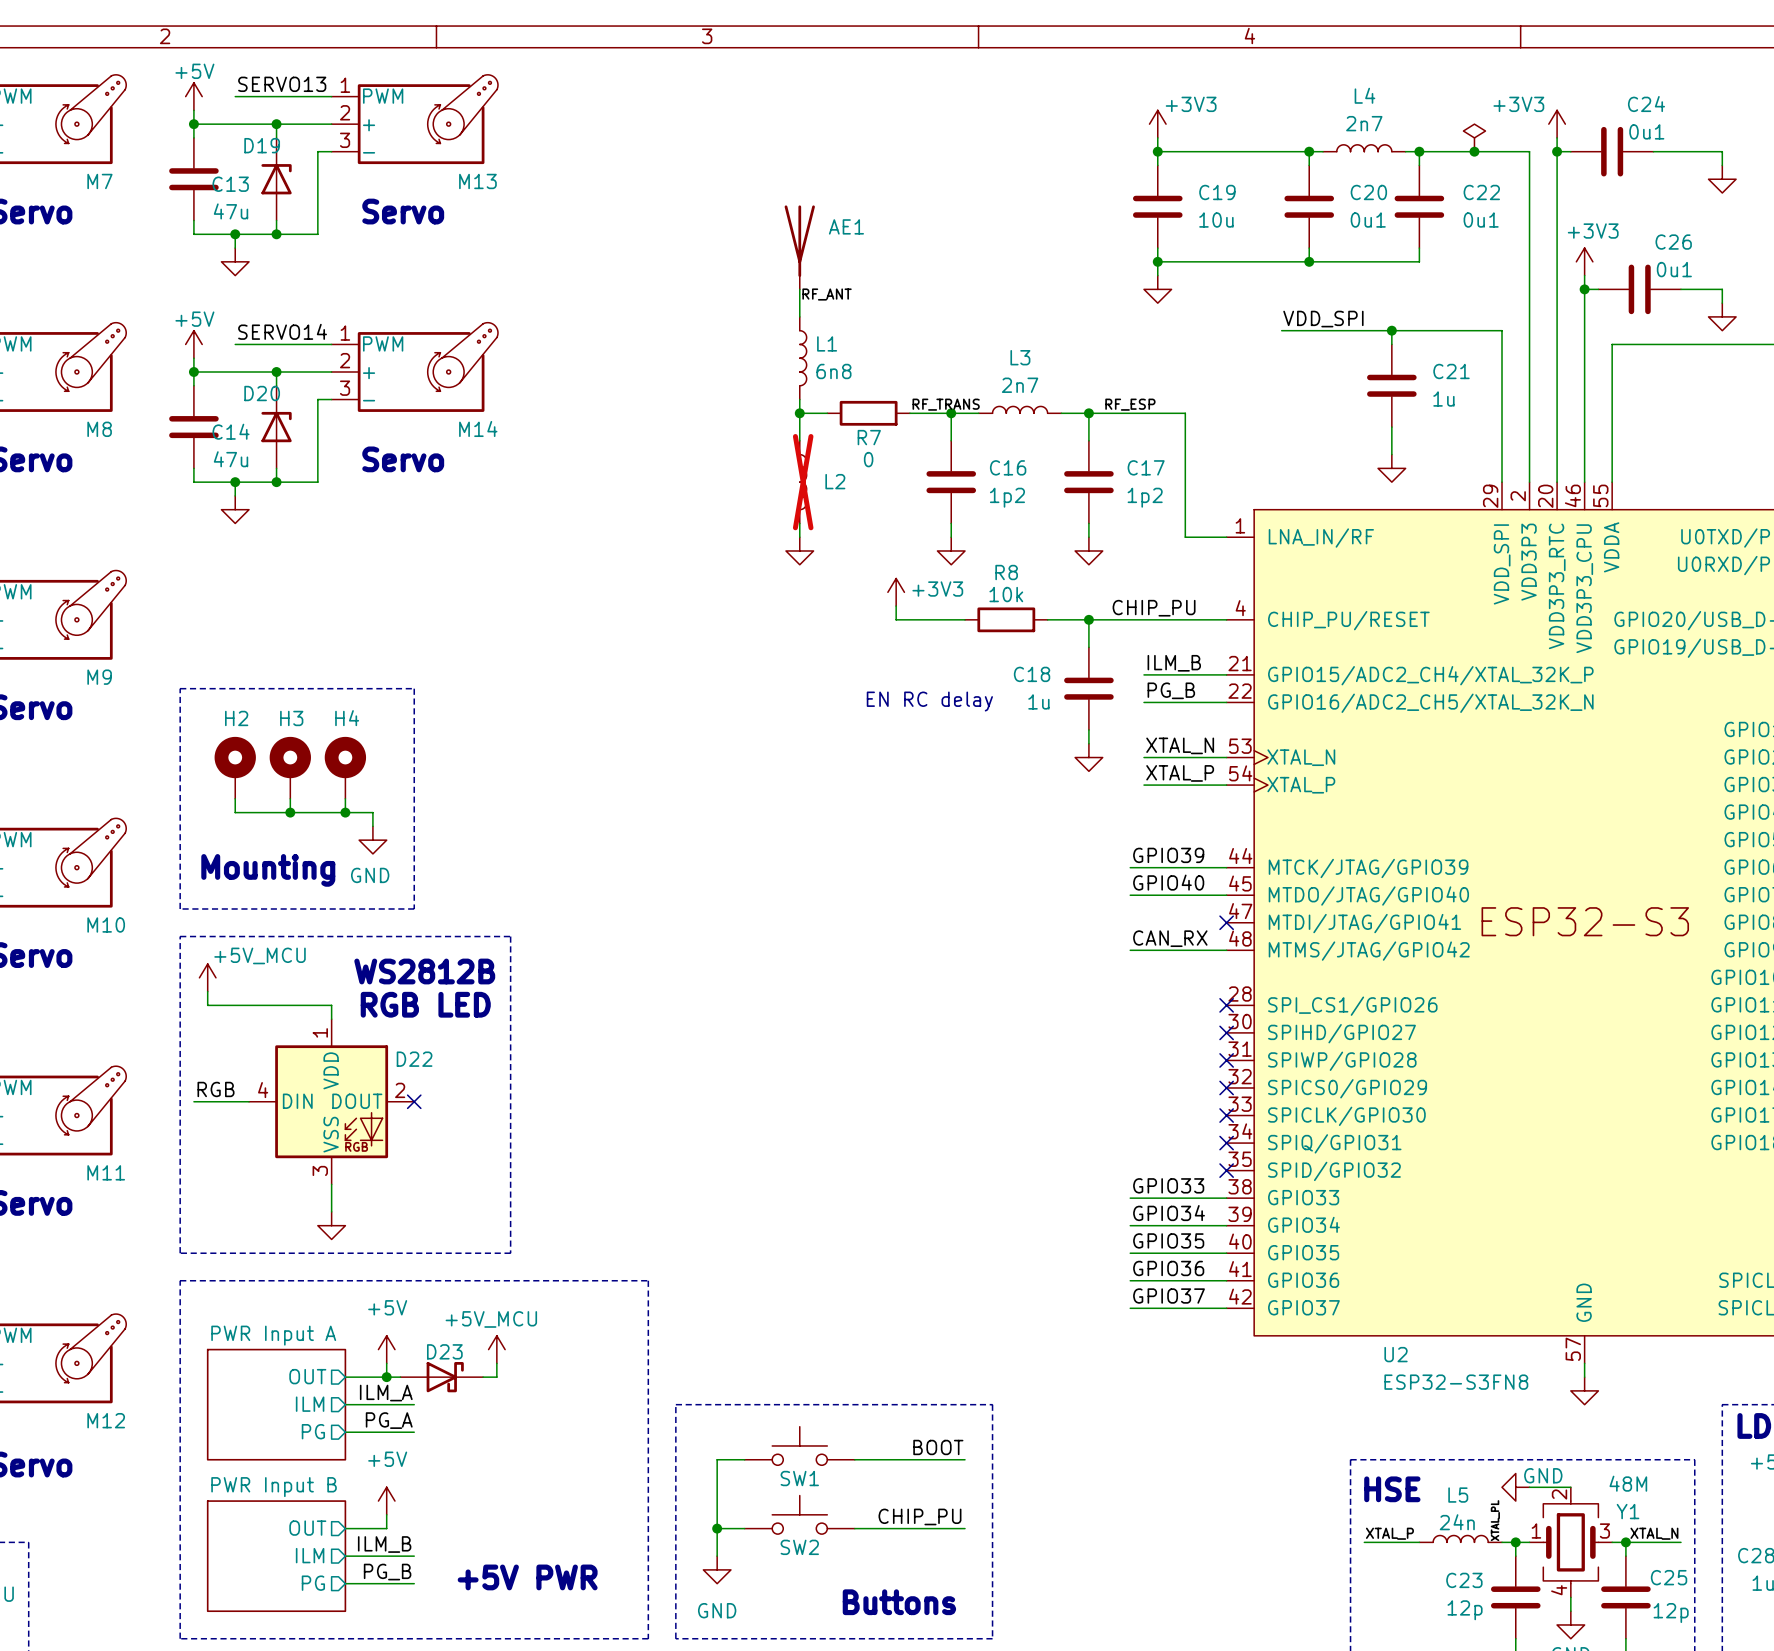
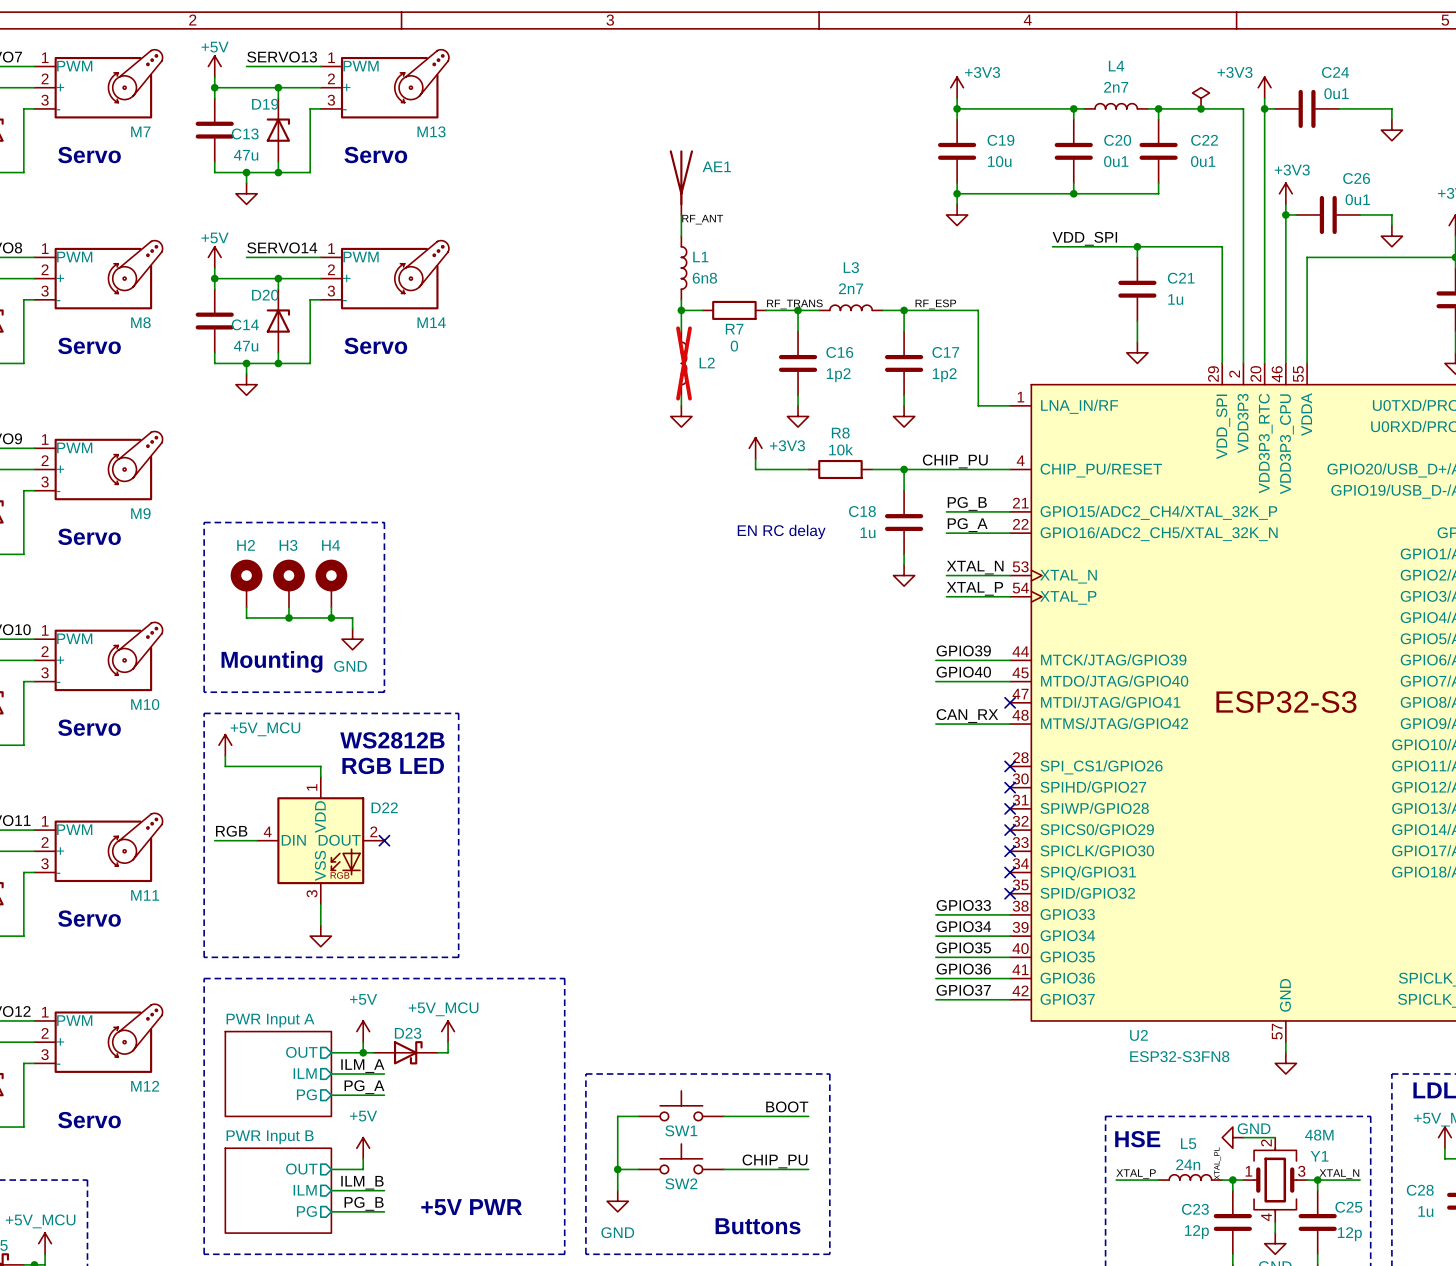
label: ILM_B (1174, 663) -> PG_B (967, 503)
label: PG_B (1171, 690) -> PG_A (967, 525)

